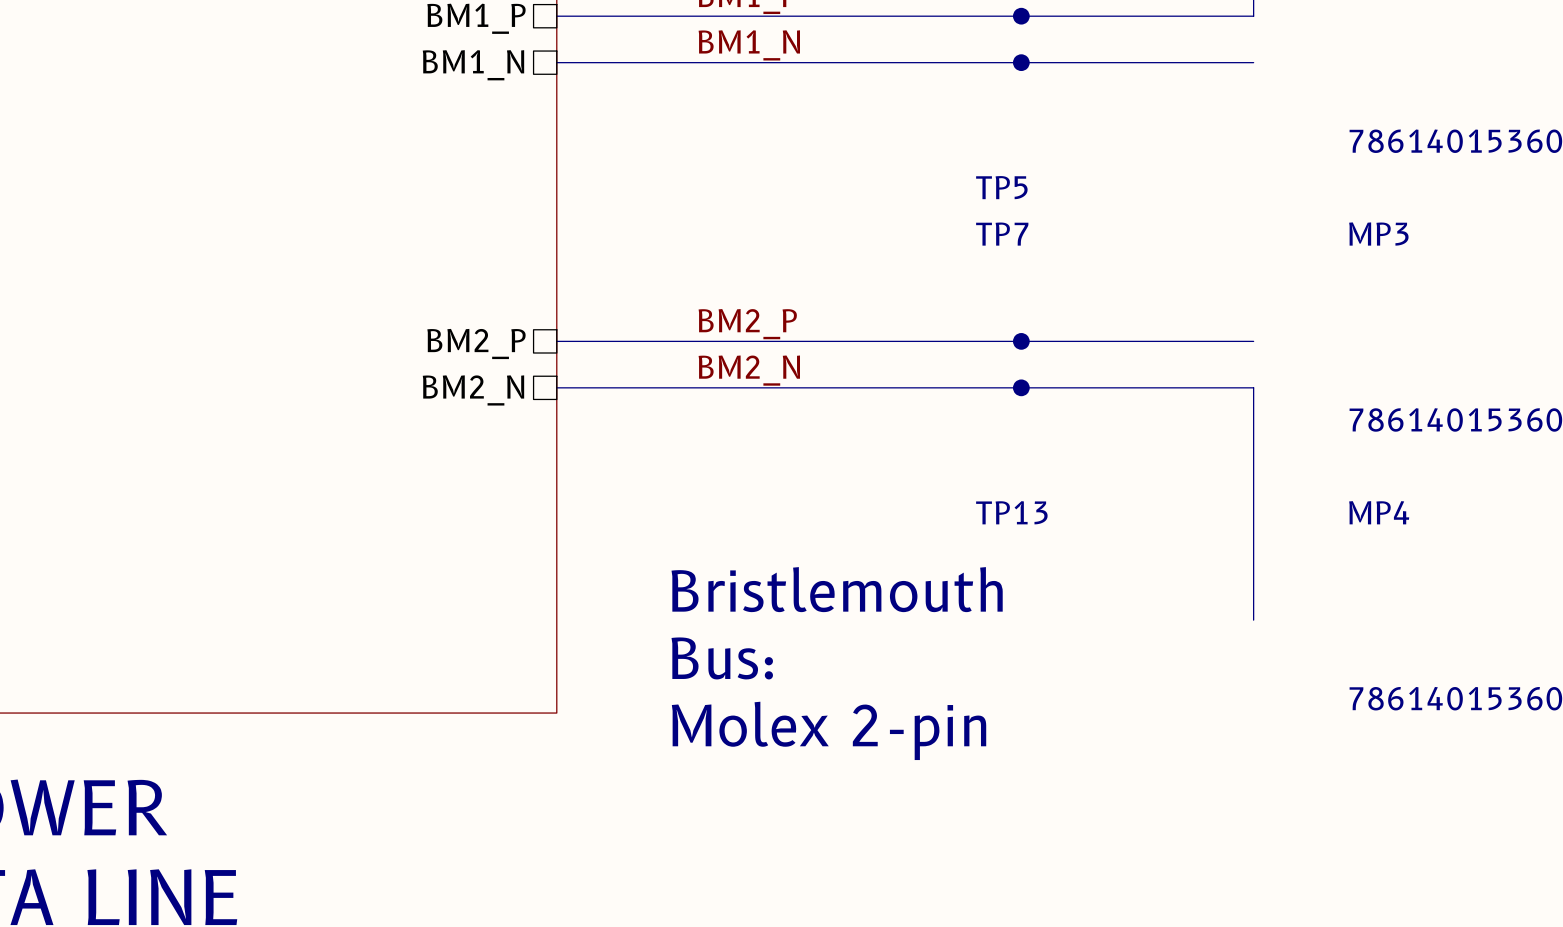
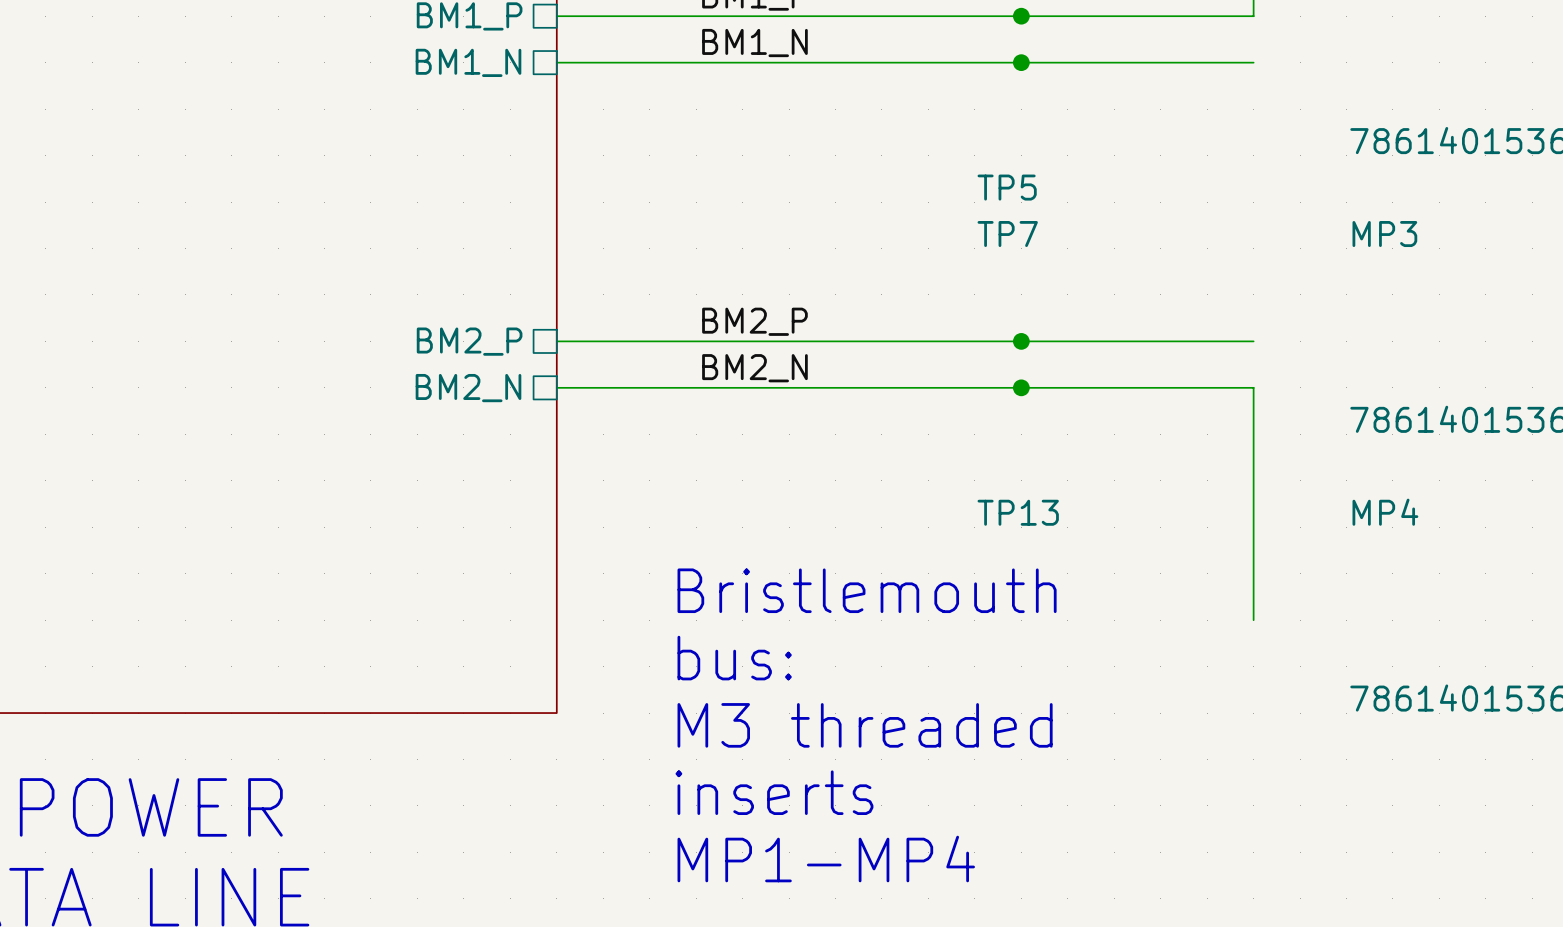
text: Bus: (722, 658) -> bus: (734, 658)
text: Molex 2-pin (829, 730) -> M3 threaded (865, 725)
text: none -> inserts (774, 792)
text: none -> MP1-MP4 (826, 859)

